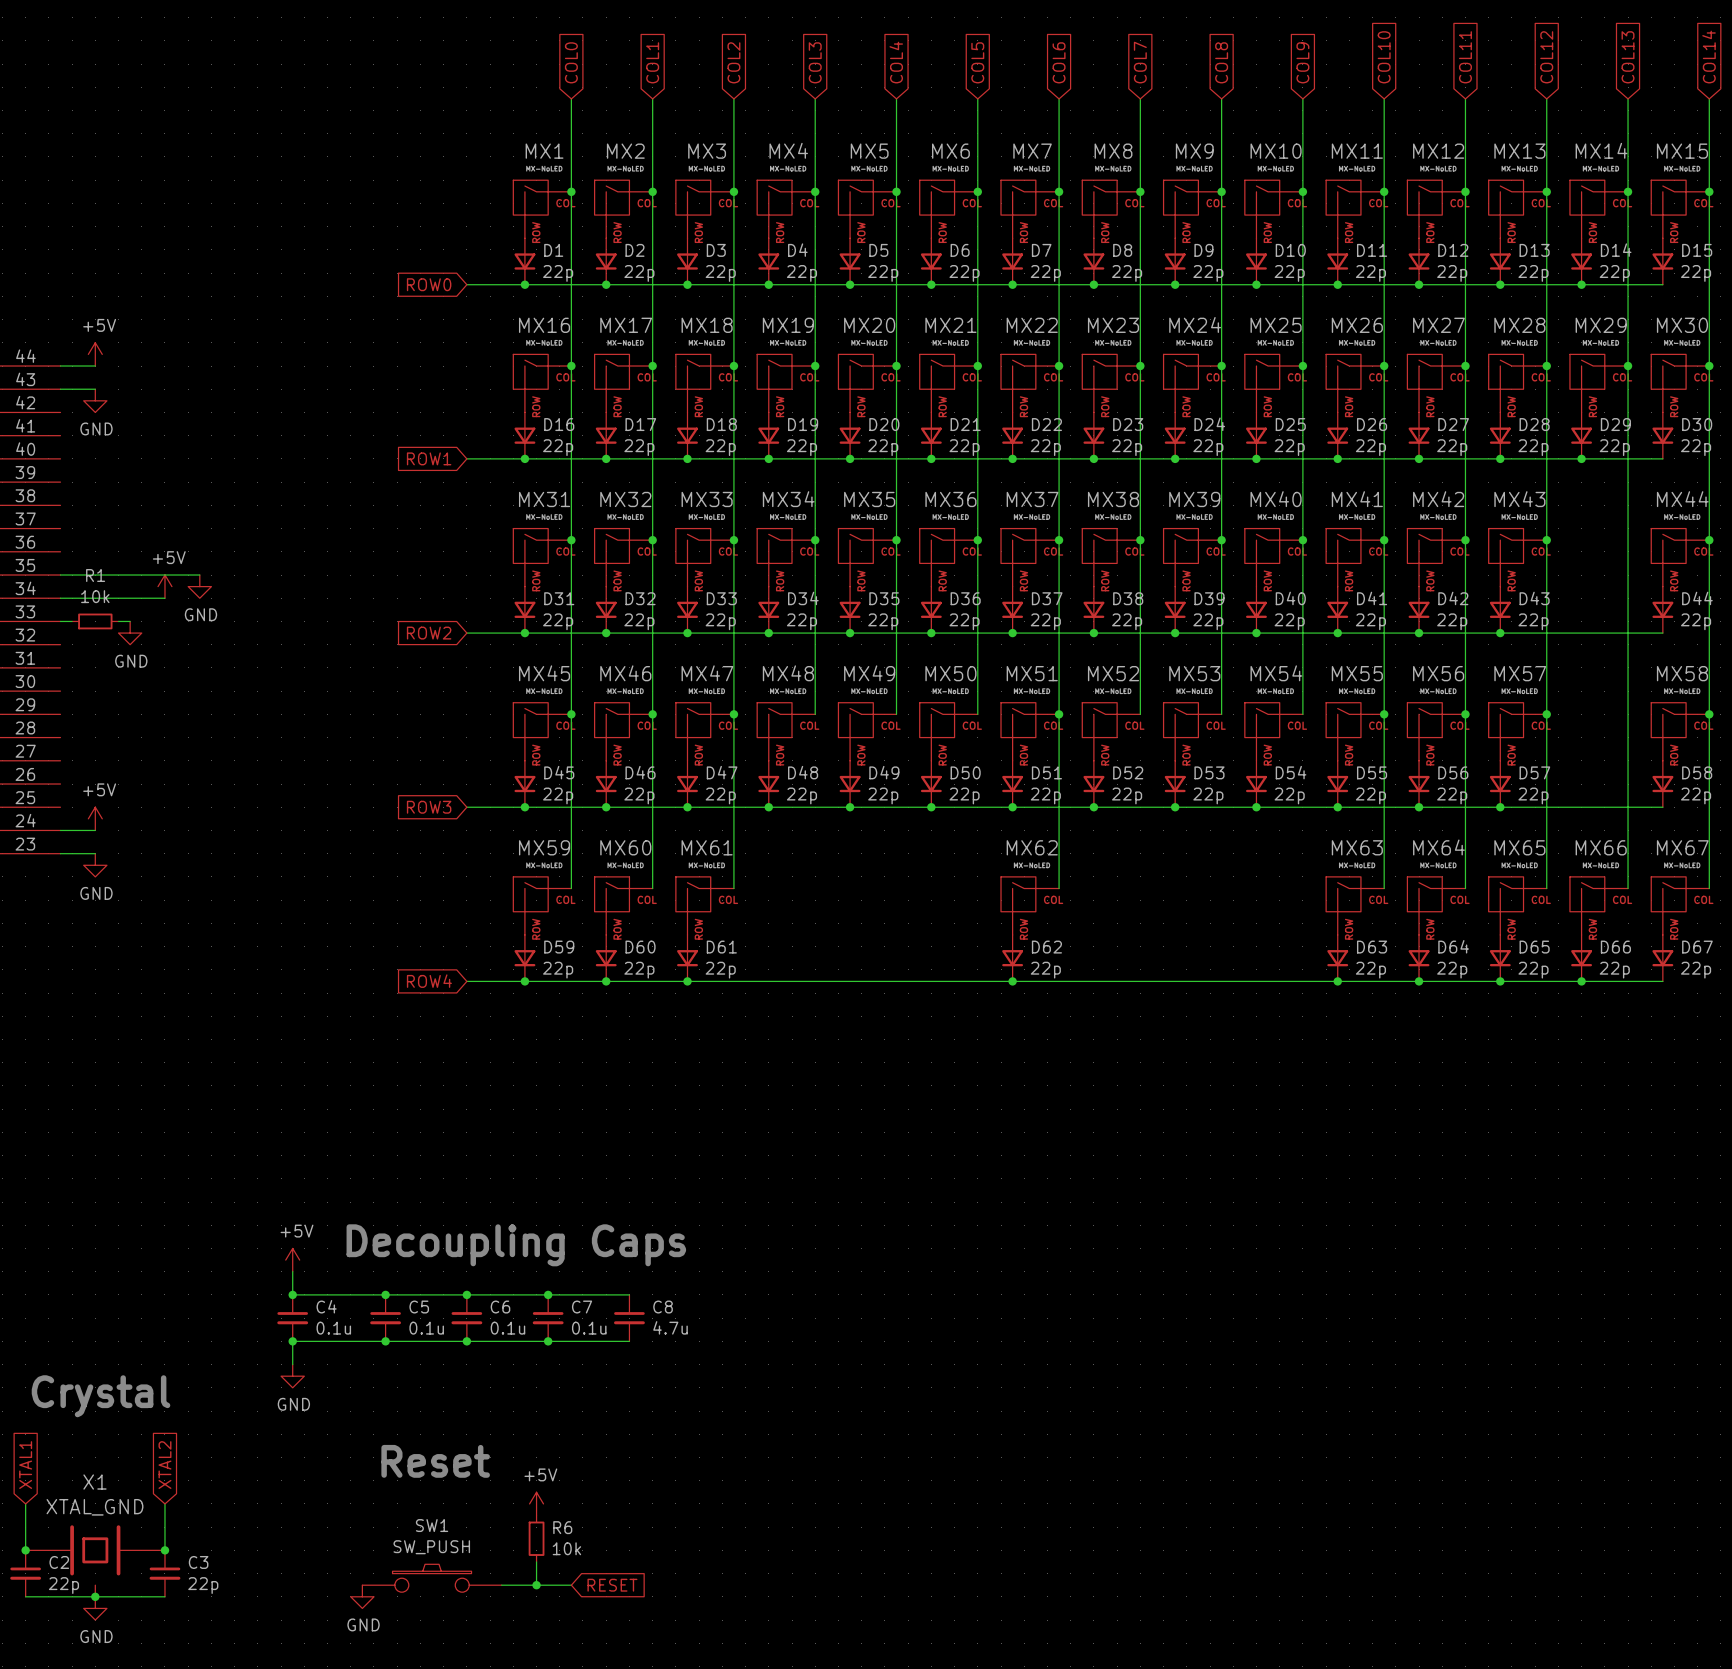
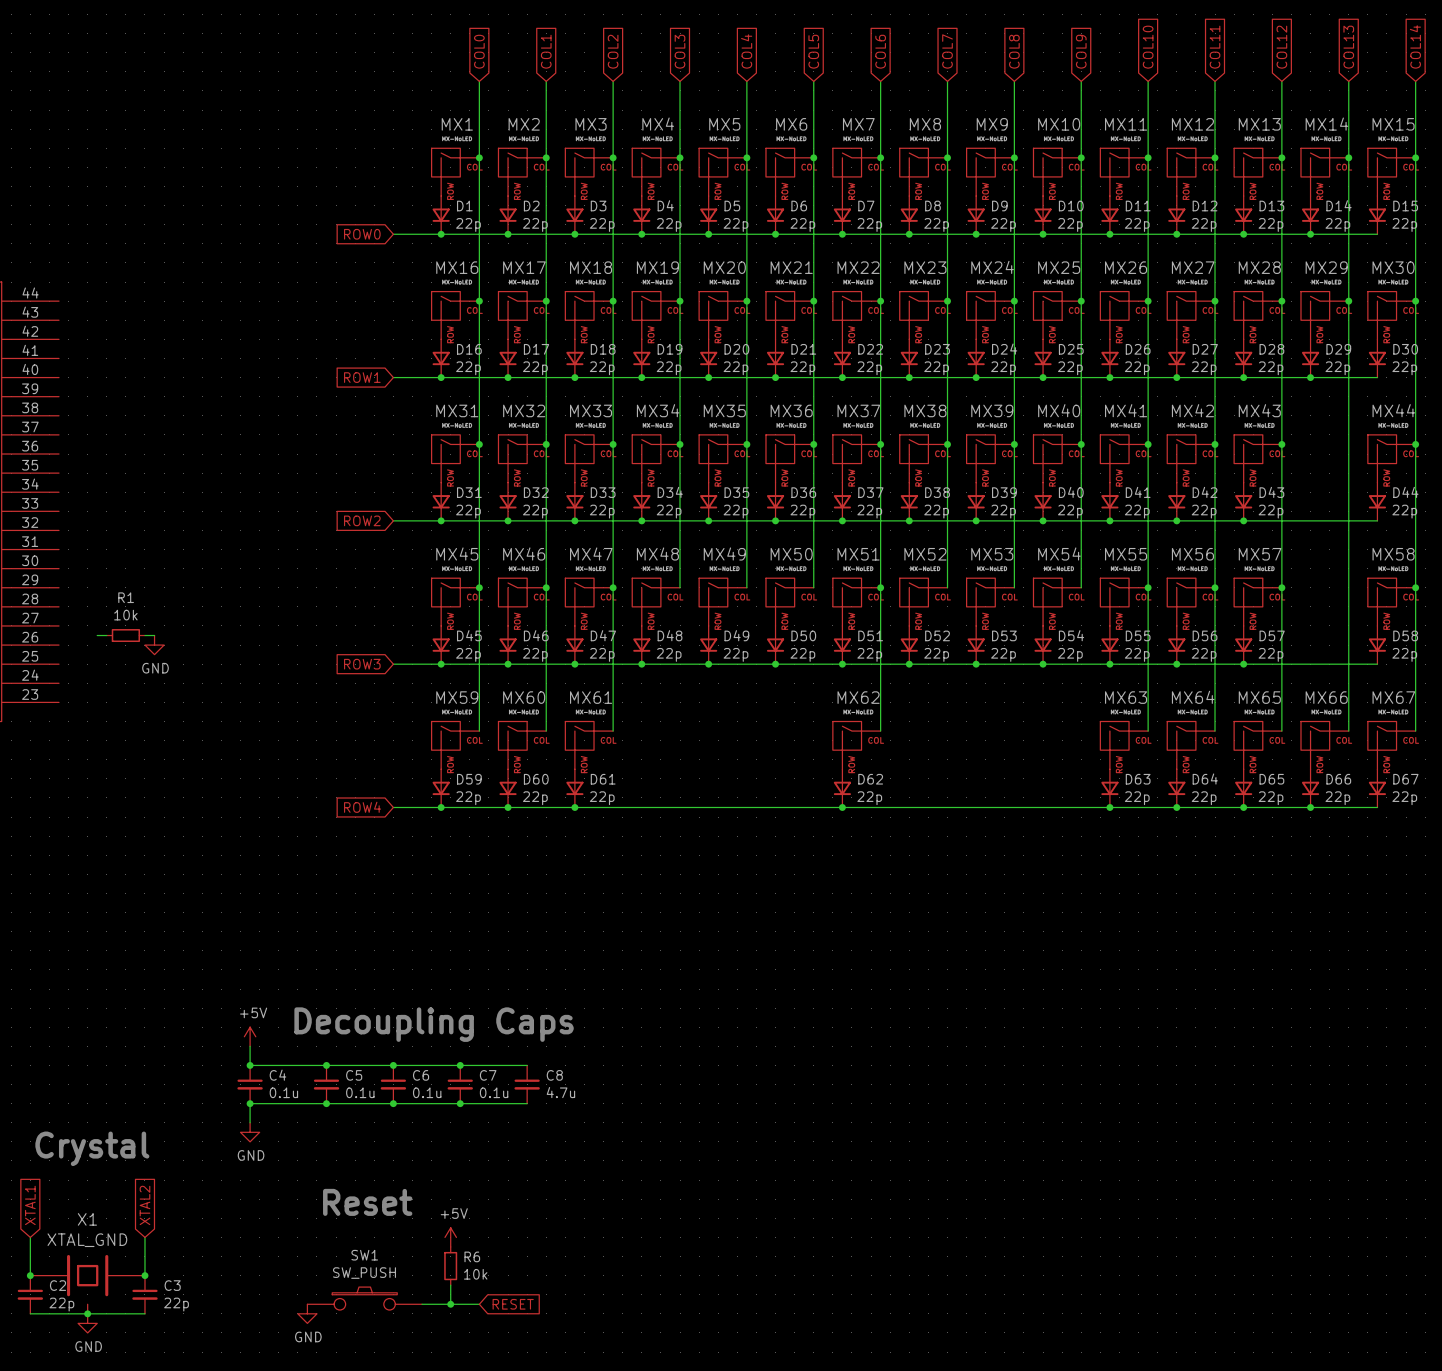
power symbol: +5V (95, 354) -> none
wire: (60, 366) (95, 366) -> none
wire: (60, 389) (95, 389) -> none
power symbol: GND (95, 400) -> none
wire: (60, 575) (199, 575) -> none
power symbol: +5V (164, 586) -> none
power symbol: GND (199, 586) -> none
wire: (60, 598) (164, 598) -> none
wire: (60, 621) (72, 621) -> (97, 635) (106, 635)
R1 position: (95, 621) -> (125, 635)
wire: (118, 621) (130, 621) -> (144, 635) (154, 635)
power symbol: GND (130, 633) -> none
power symbol: none -> GND (154, 645)
power symbol: +5V (95, 818) -> none
wire: (60, 830) (95, 830) -> none
wire: (60, 853) (95, 853) -> none
power symbol: GND (95, 865) -> none

